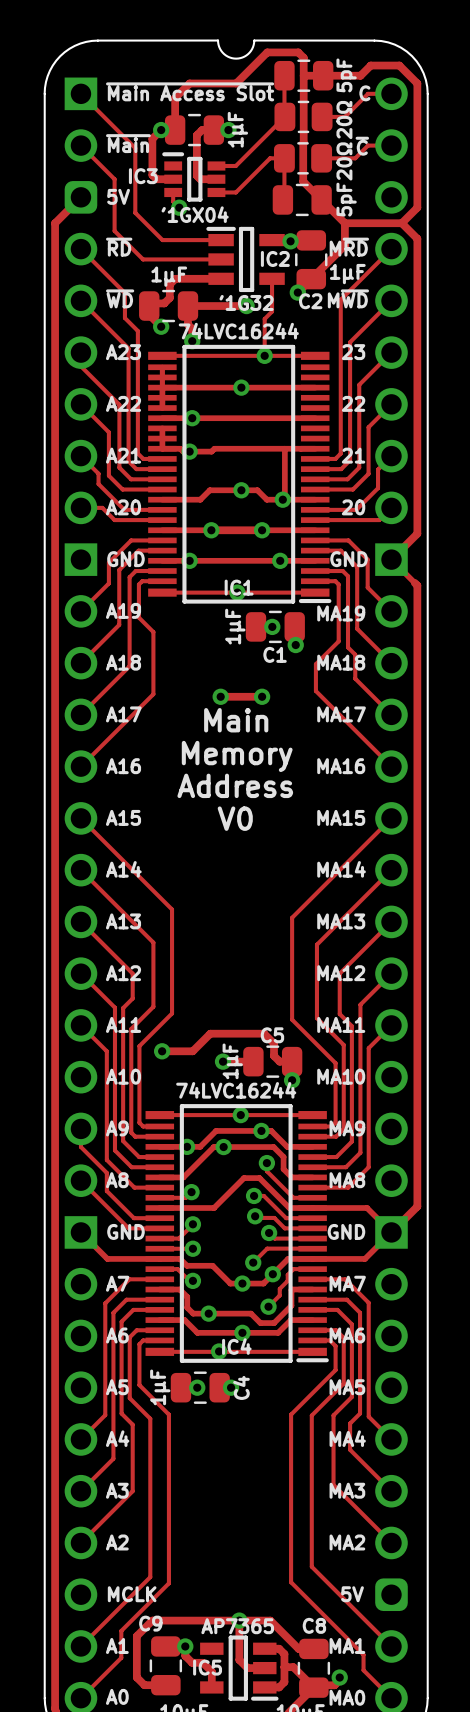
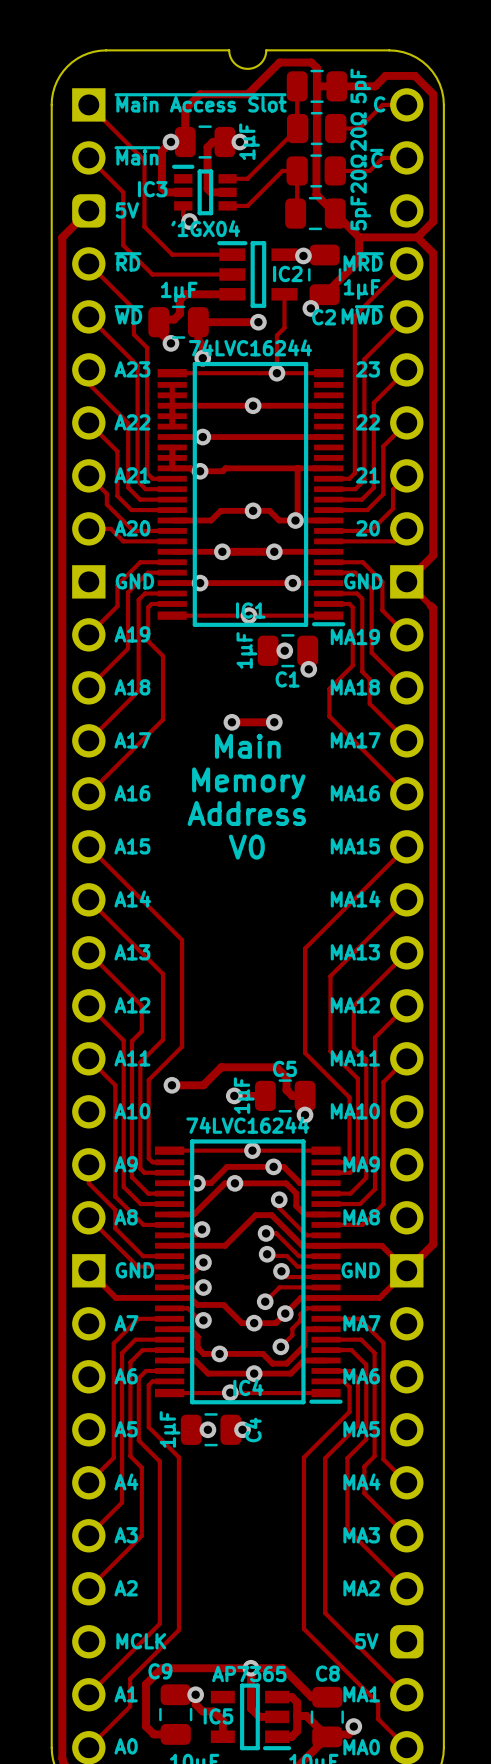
IC2 text: '1G32 (246, 302) -> none

